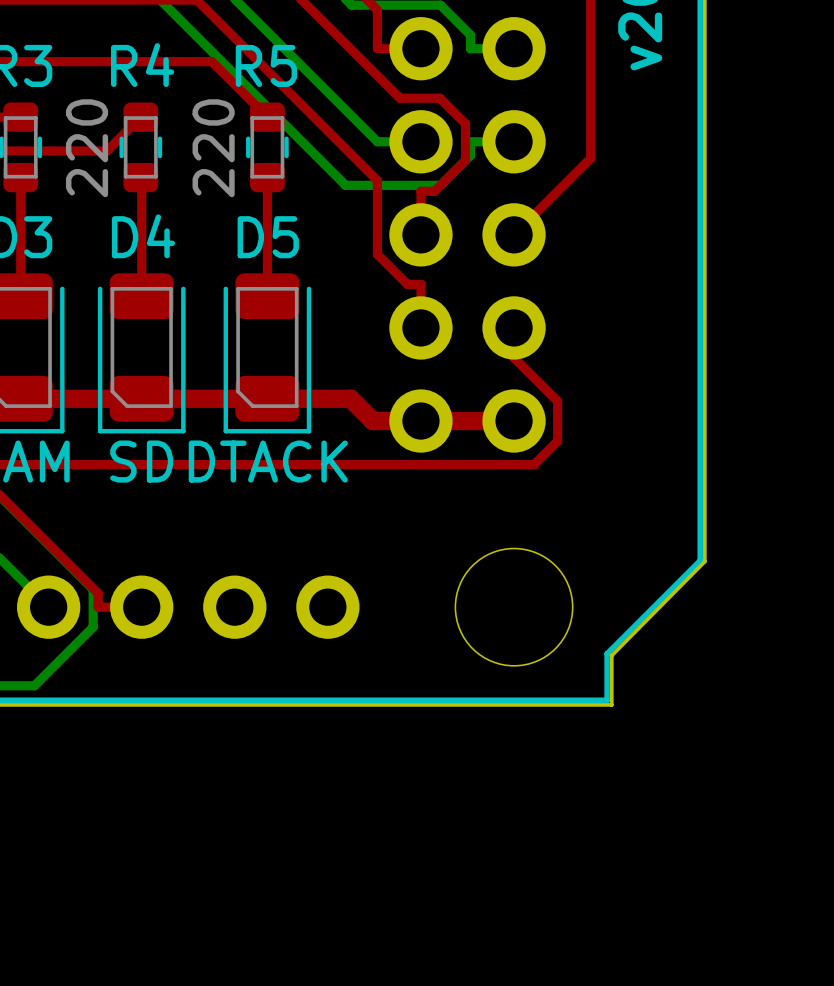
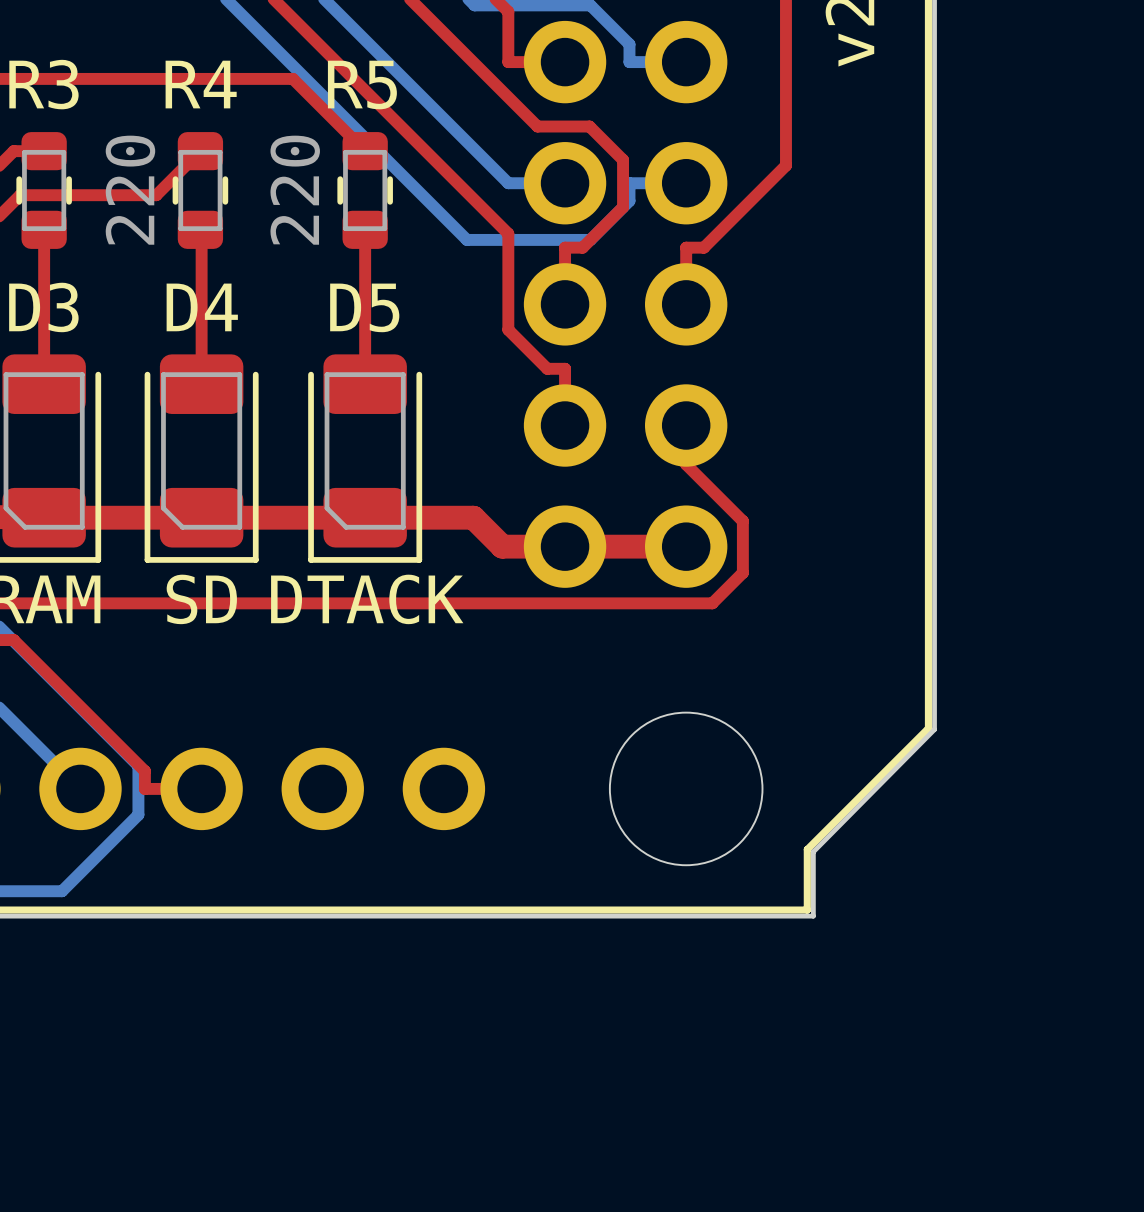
top track: (590, 128) (590, 158) (514, 234) -> (785, 165) (703, 247) (686, 247) (686, 304)

